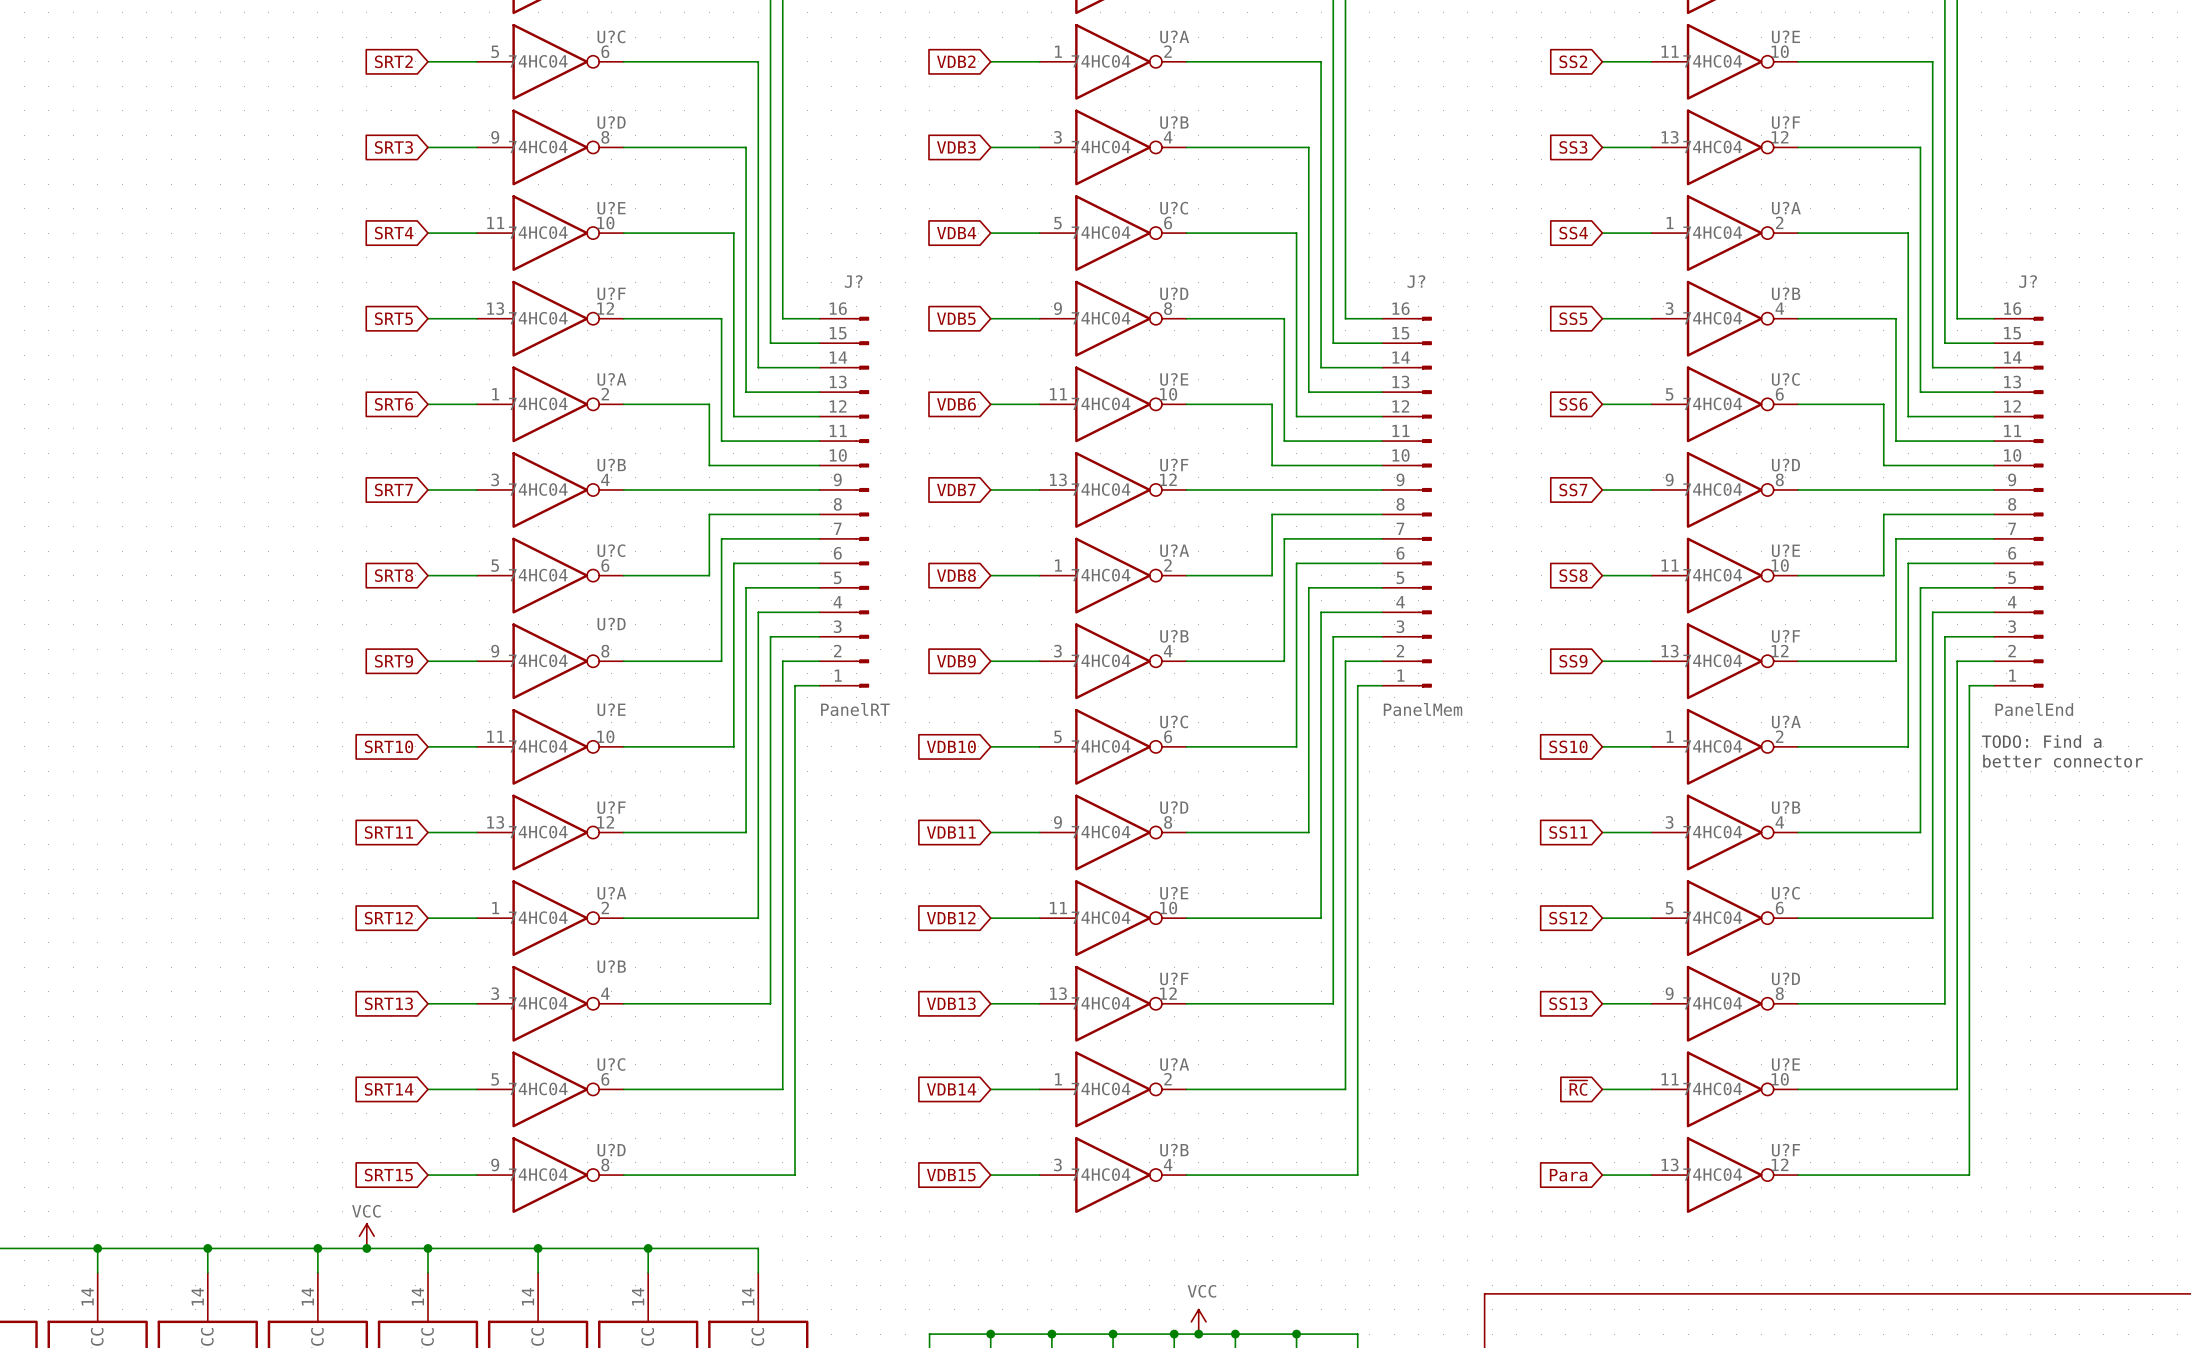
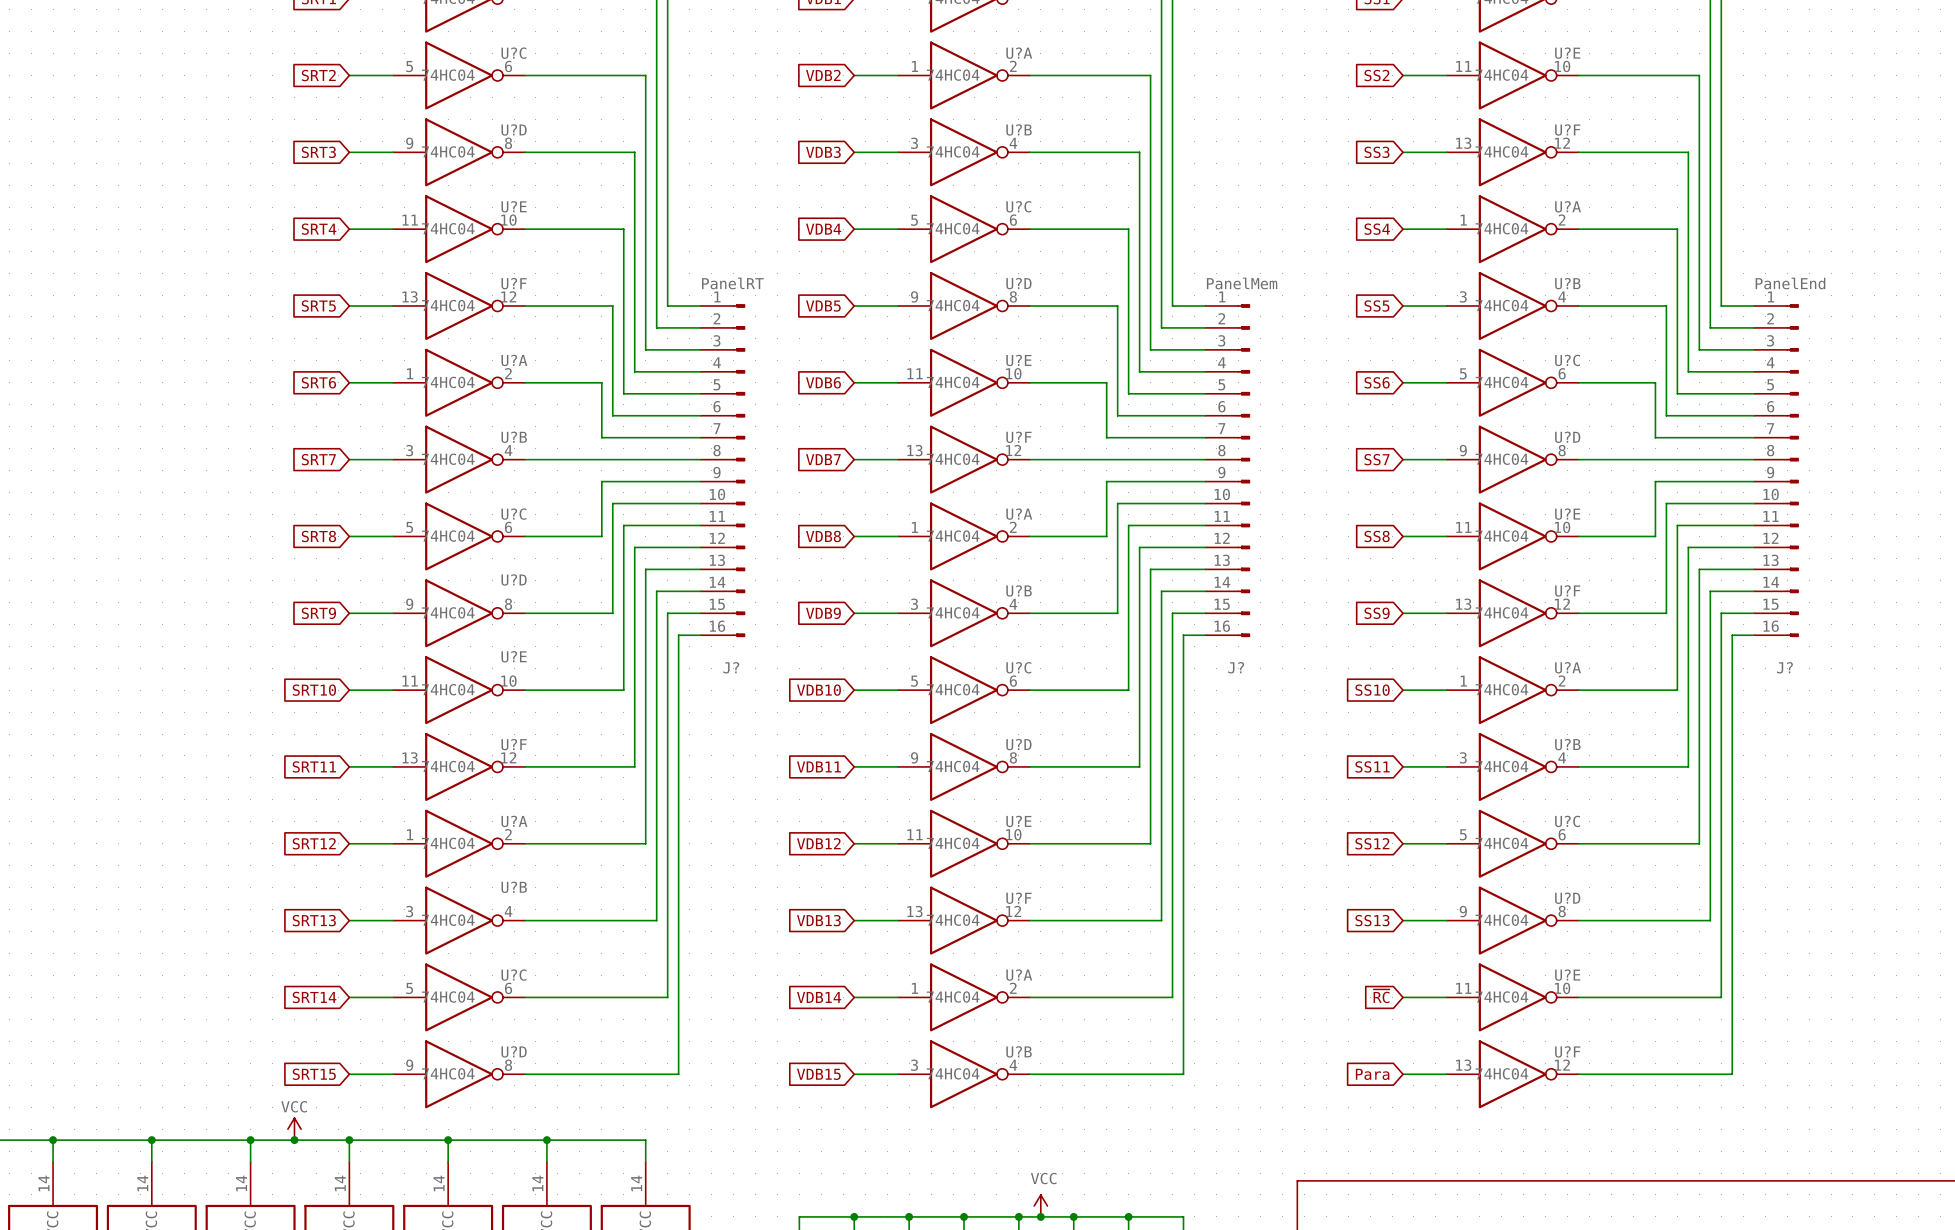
J? flip: as is (862, 502) -> up-down (739, 470)
J? flip: as is (1425, 502) -> up-down (1243, 470)
J? flip: as is (2036, 502) -> up-down (1792, 470)
text: TODO: Find a (2041, 741) -> none
text: better connector (2062, 761) -> none

